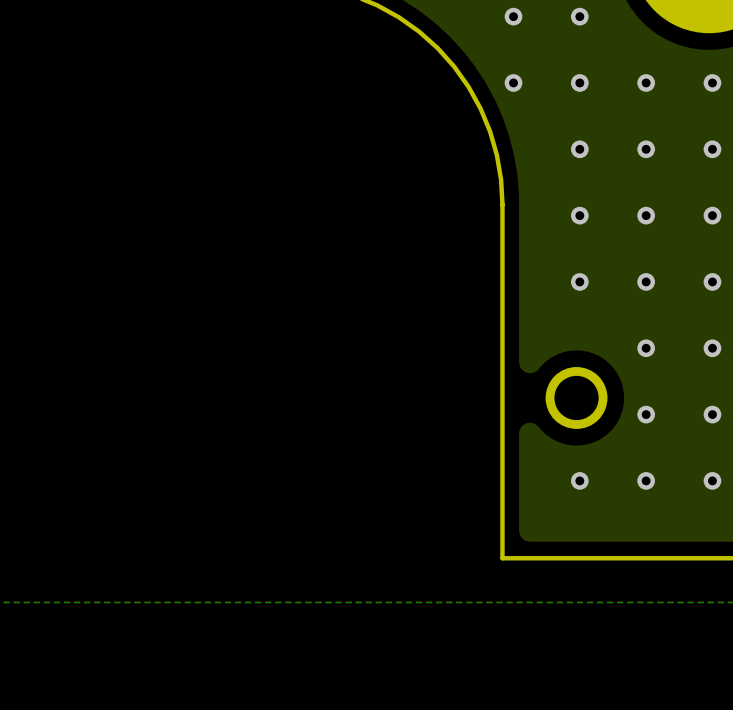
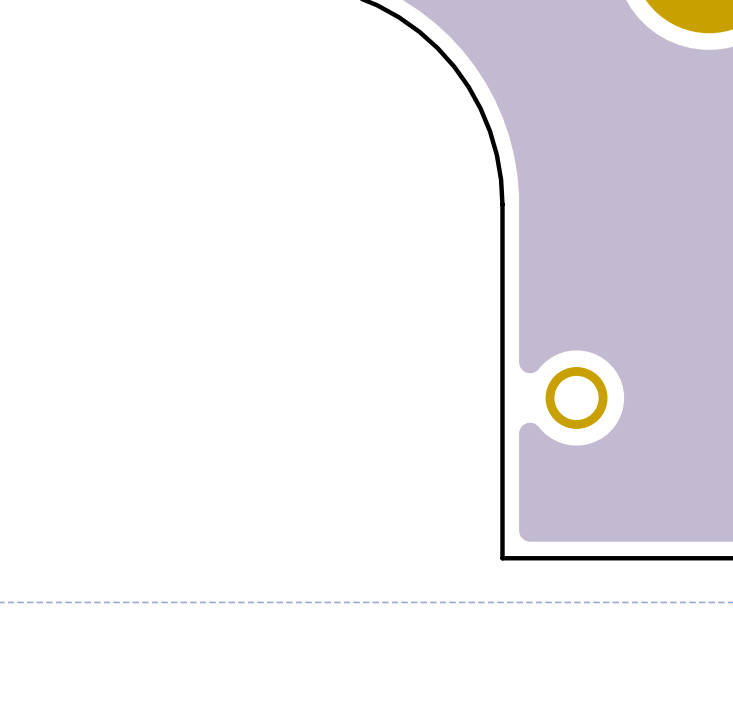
via: (513, 16) -> none
via: (579, 16) -> none
via: (513, 82) -> none
via: (579, 82) -> none
via: (646, 82) -> none
via: (712, 82) -> none
via: (579, 149) -> none
via: (646, 149) -> none
via: (712, 149) -> none
via: (579, 215) -> none
via: (646, 215) -> none
via: (712, 215) -> none
via: (579, 281) -> none
via: (646, 281) -> none
via: (712, 281) -> none
via: (646, 348) -> none
via: (712, 348) -> none
via: (646, 414) -> none
via: (712, 414) -> none
via: (579, 480) -> none
via: (646, 480) -> none
via: (712, 480) -> none

